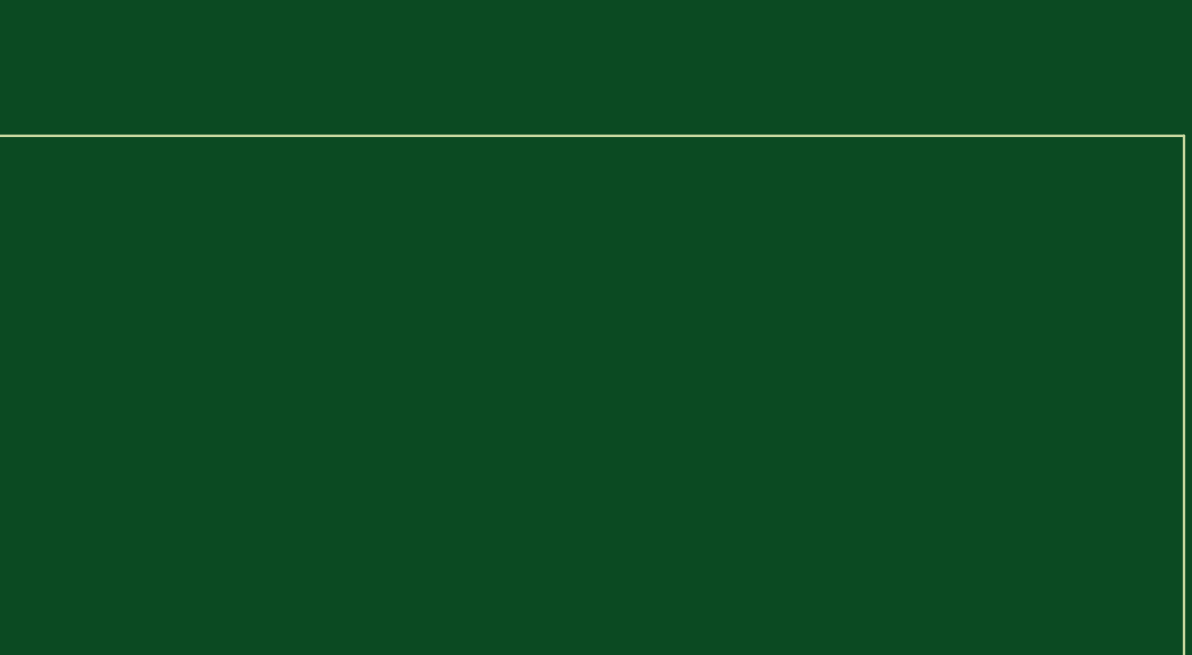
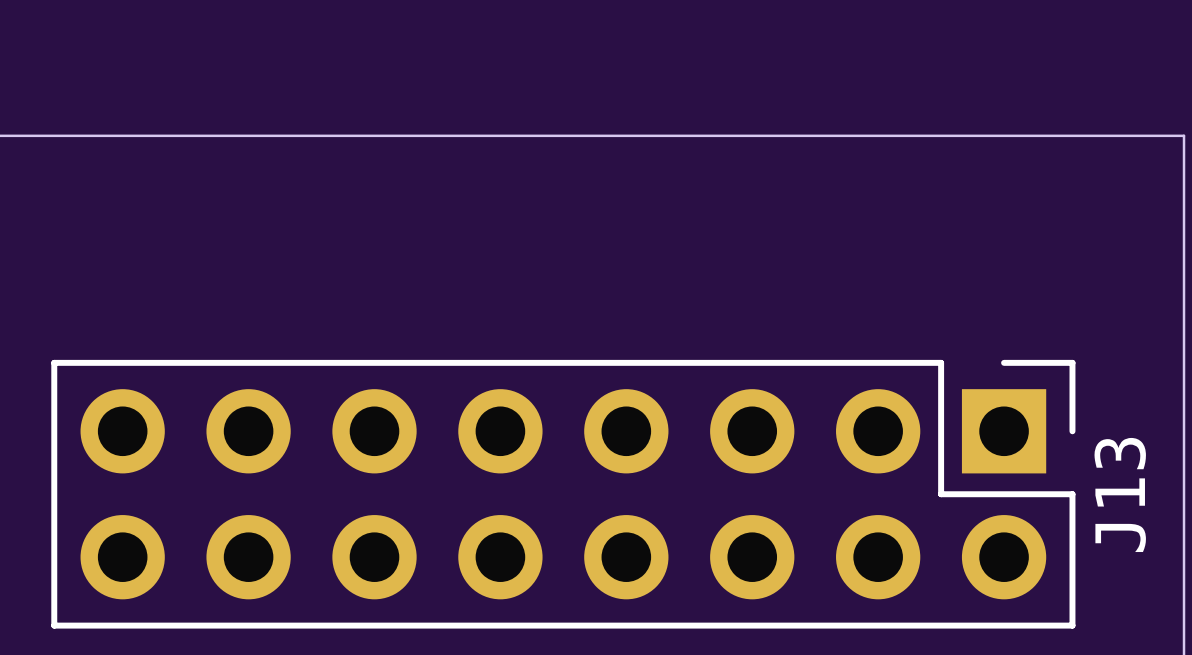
J13: none -> (563, 494)

